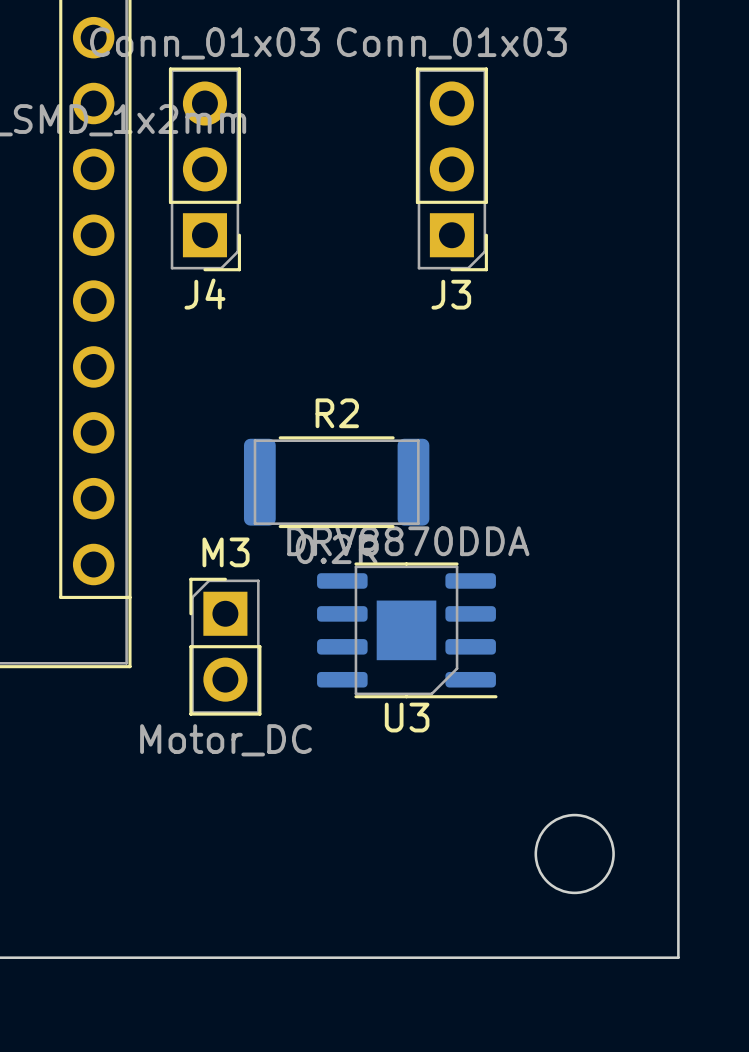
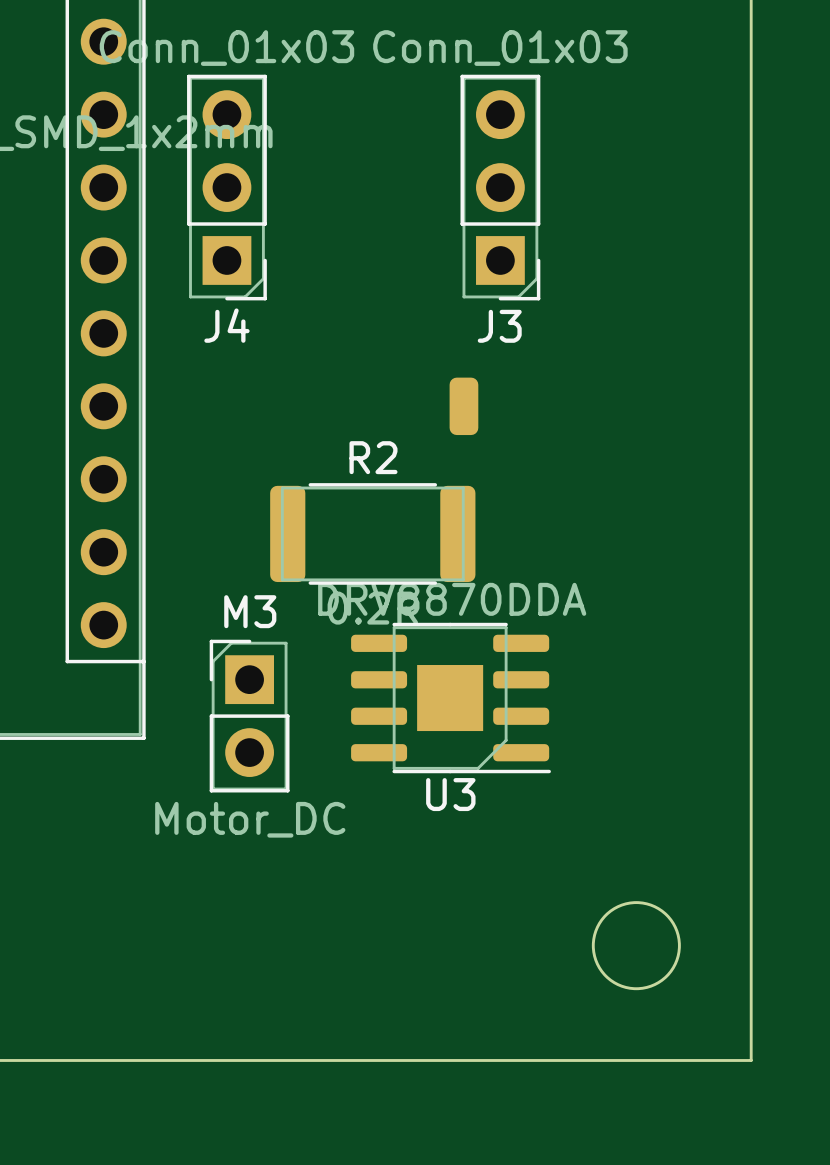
part: none -> (463, 406)

